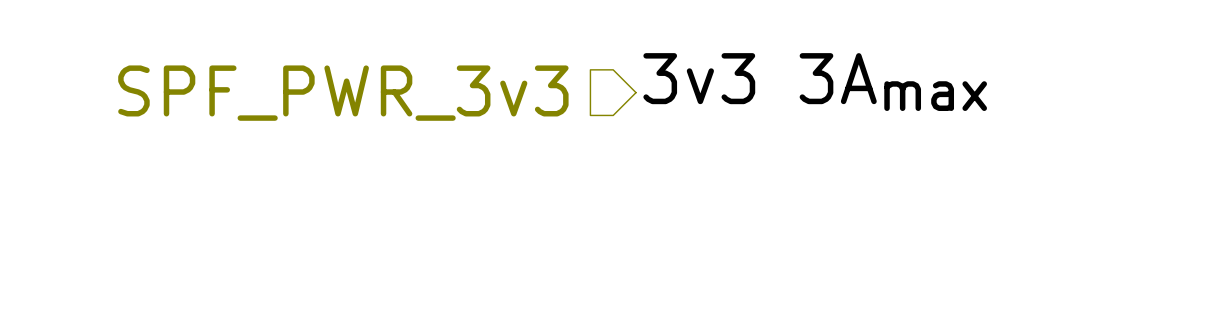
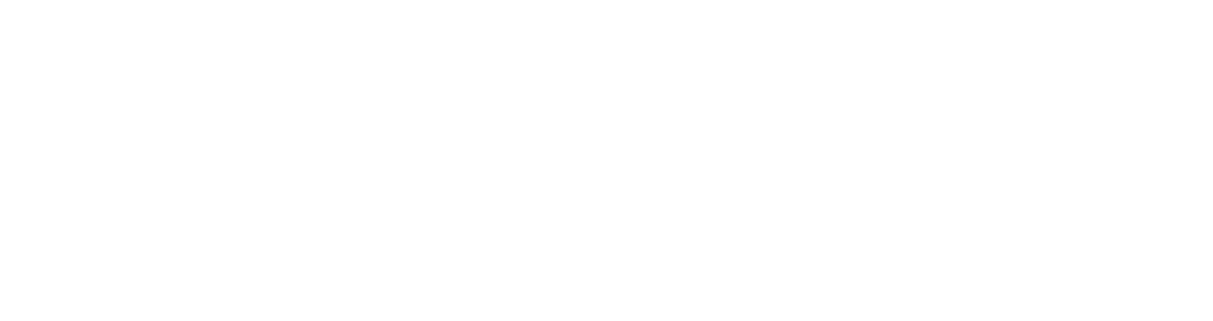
label: 3v3 3Amax (815, 82) -> none
hierarchical label: SPF_PWR_3v3 (343, 93) -> none

